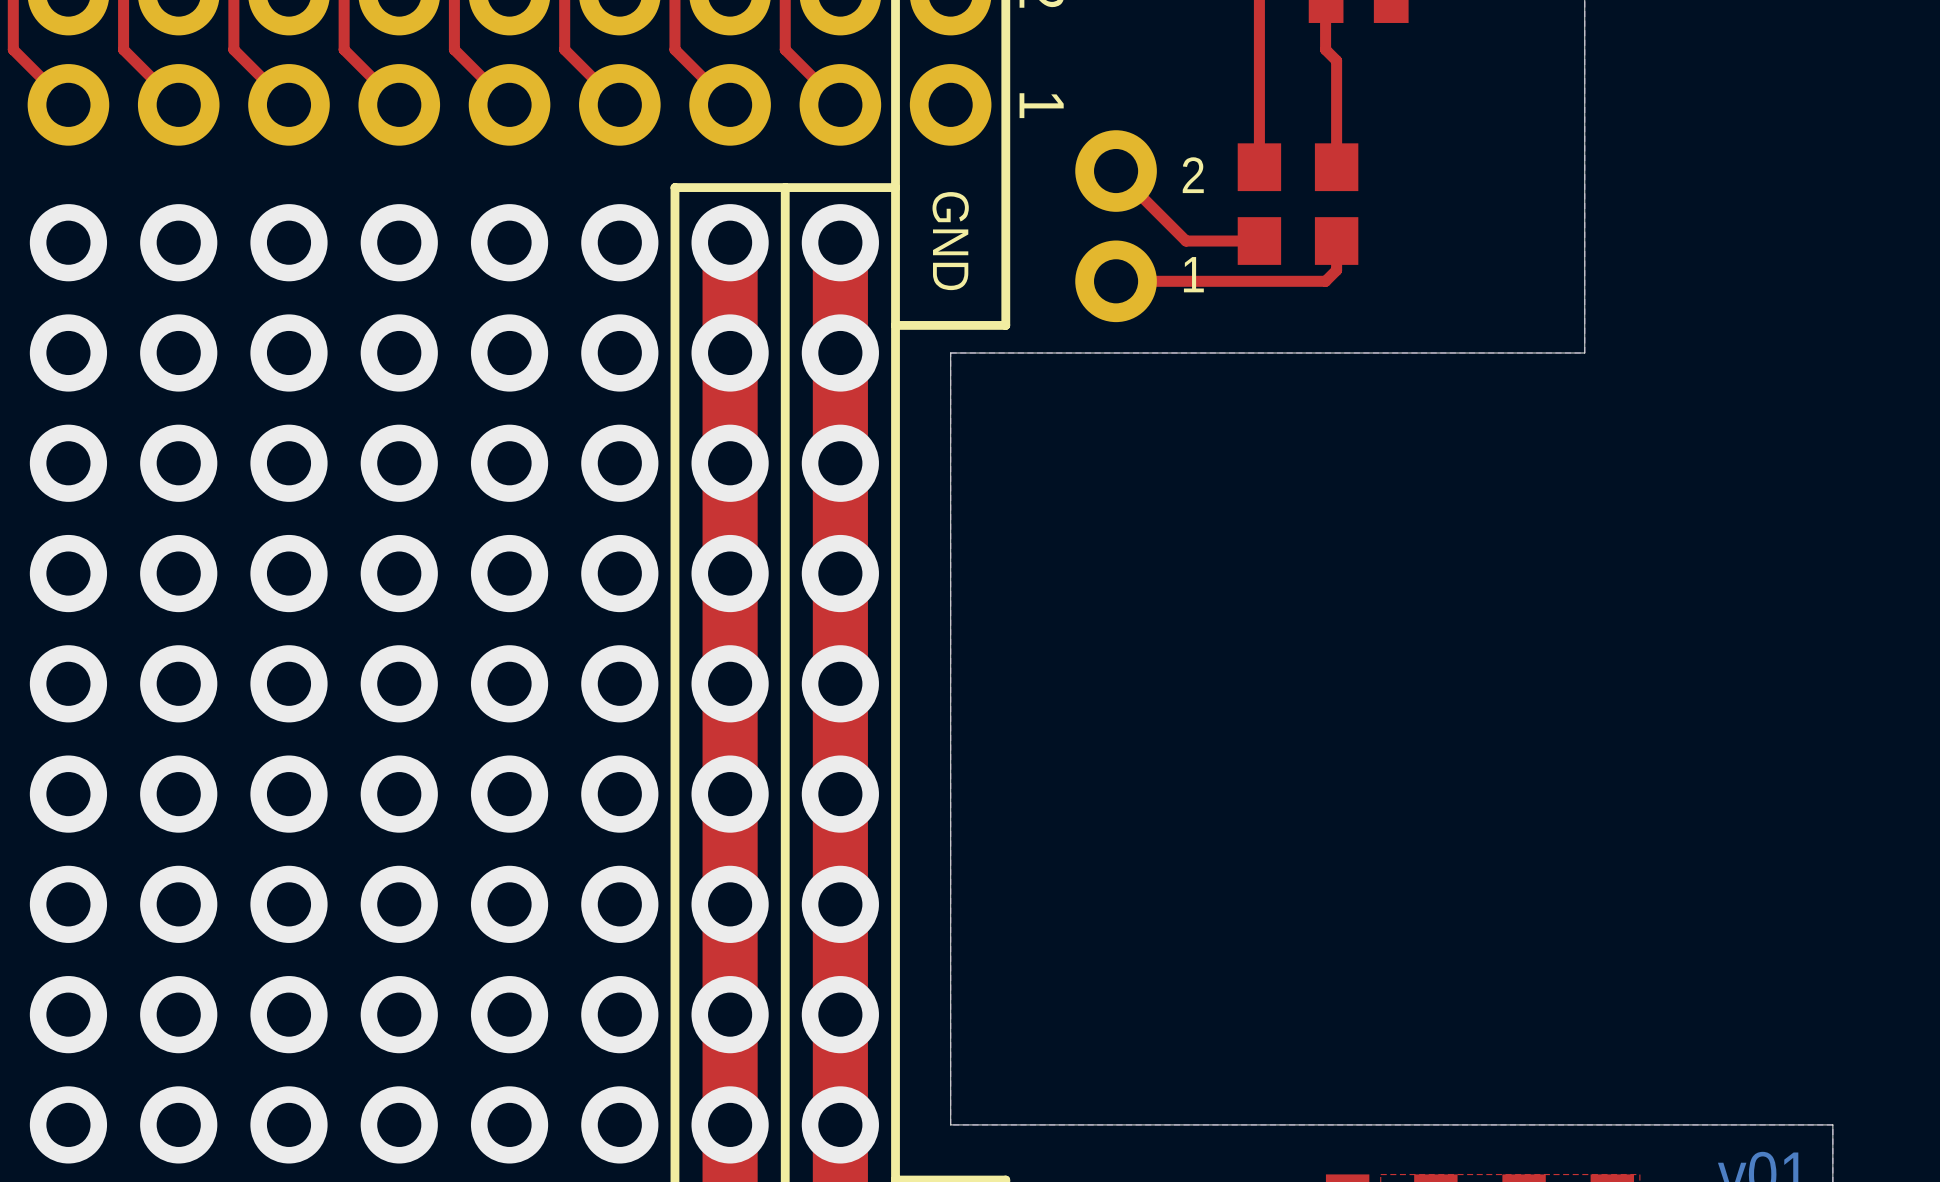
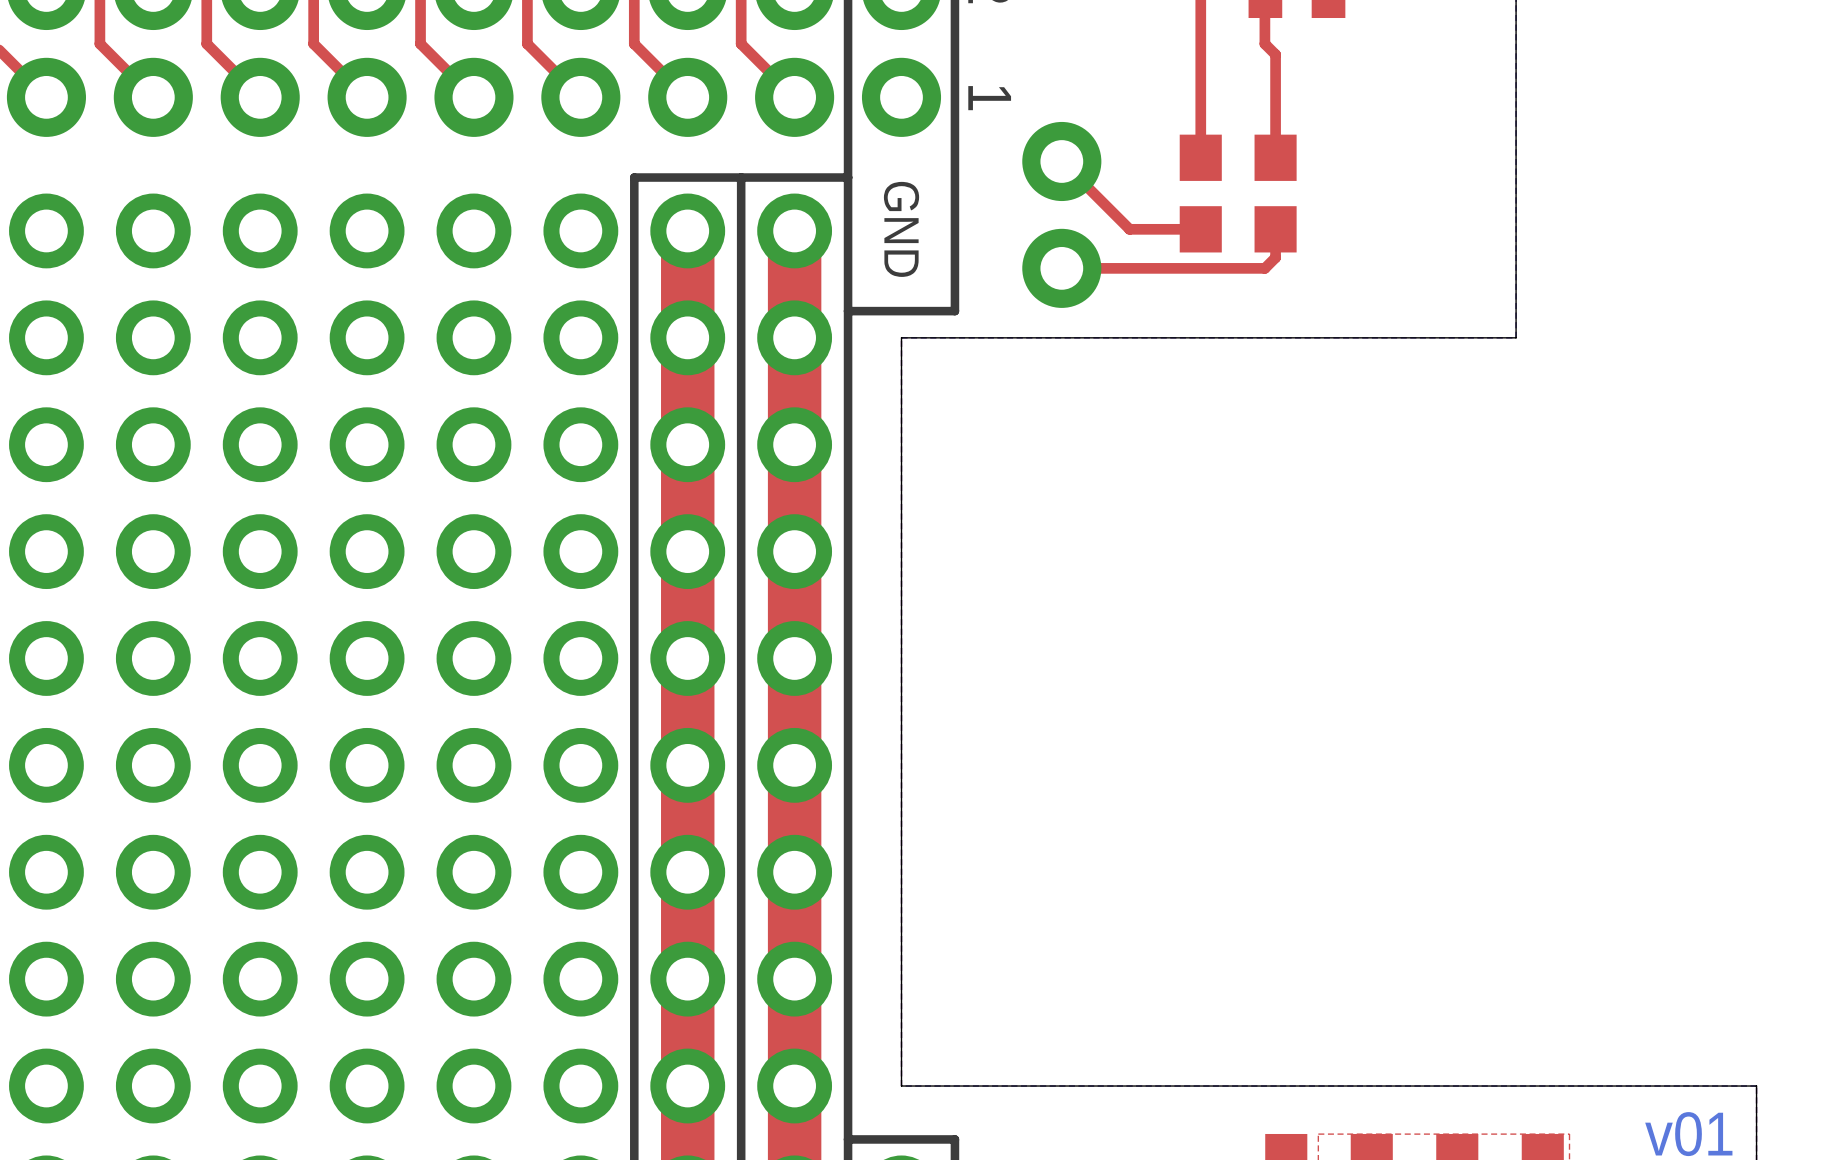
text: 2 (1193, 175) -> none
text: 1 (1193, 274) -> none

